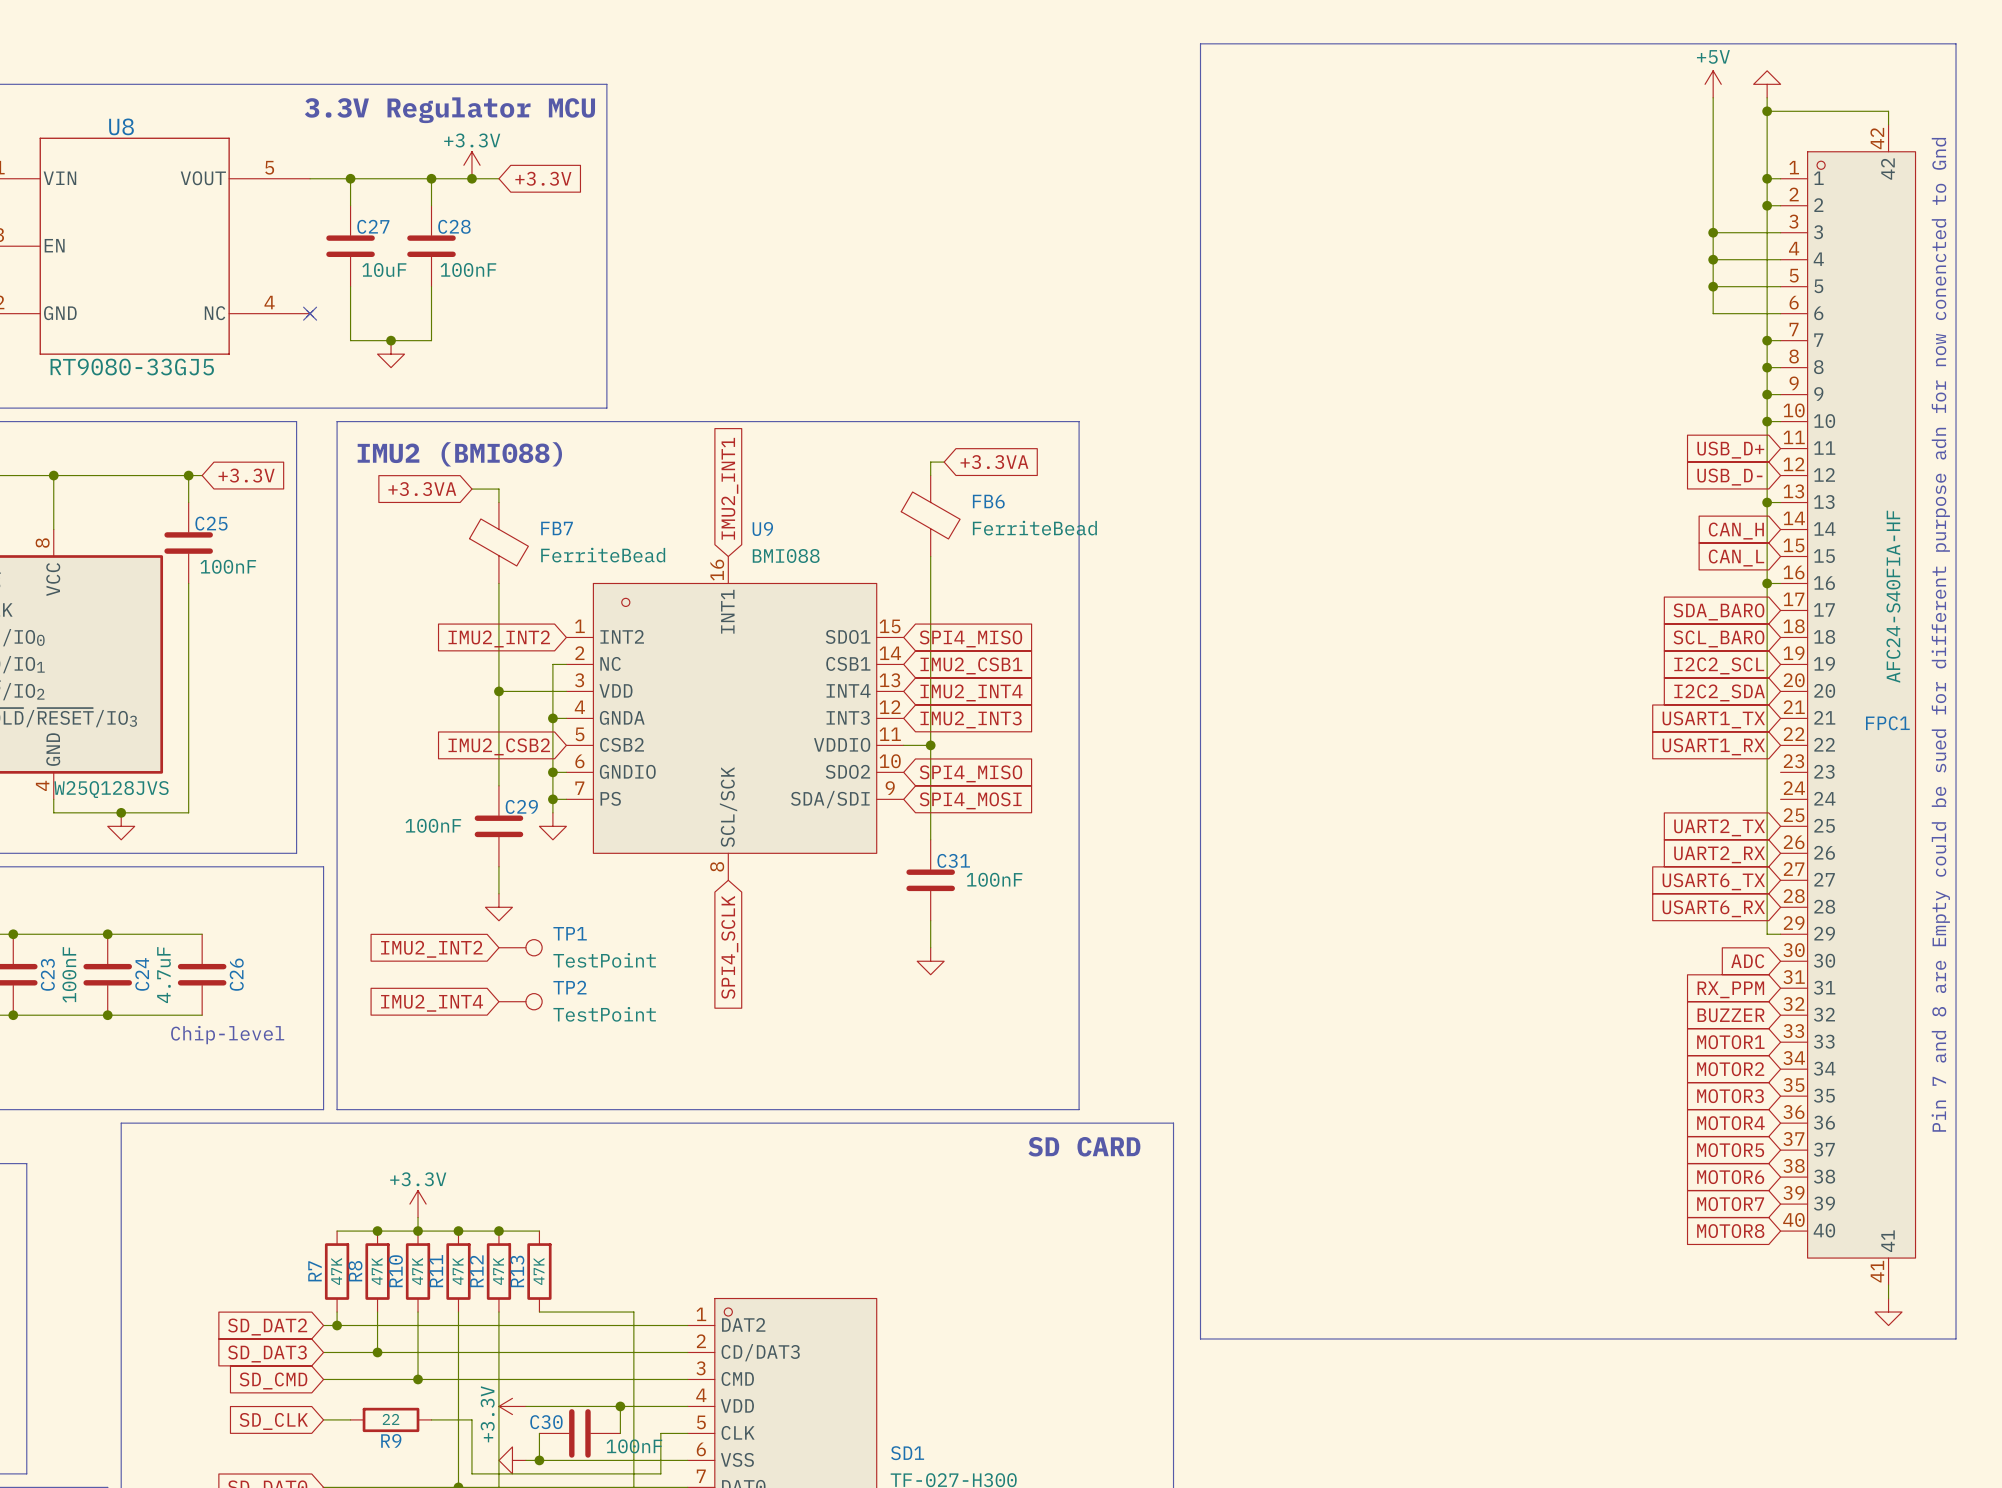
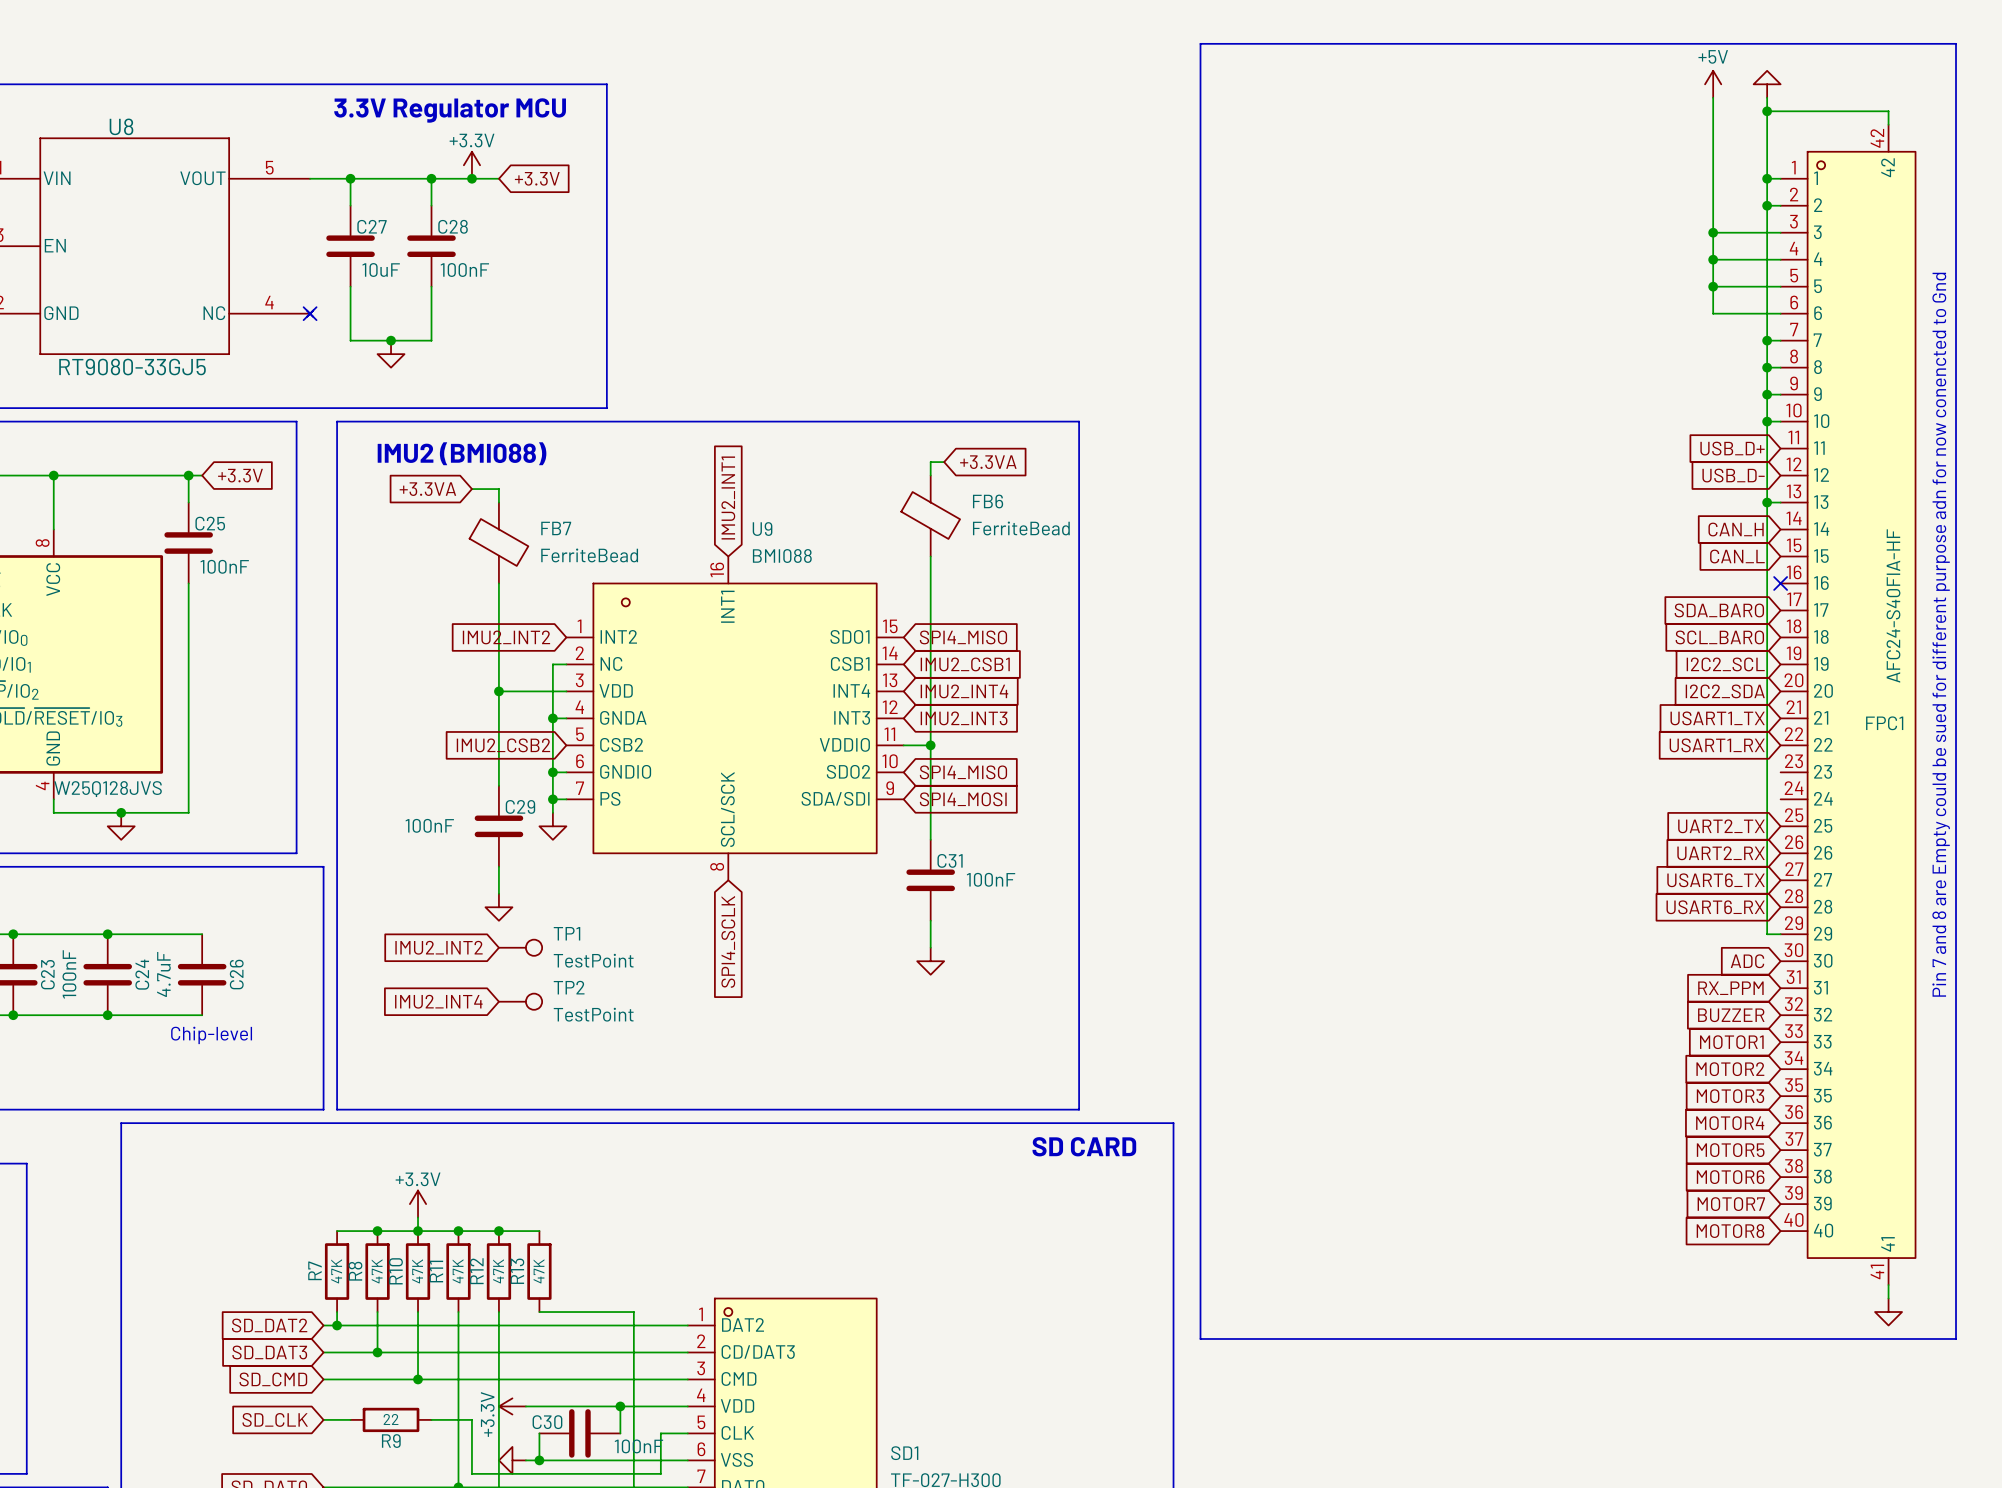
wire: (1767, 583) (1780, 583) -> none
junction: (1767, 583) -> none
no-connect mark: none -> (1780, 583)

